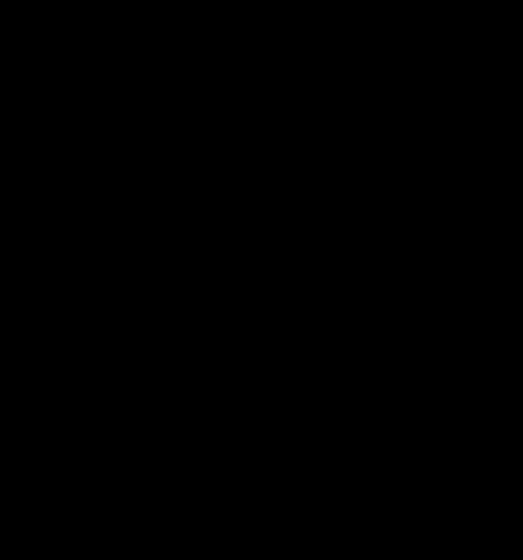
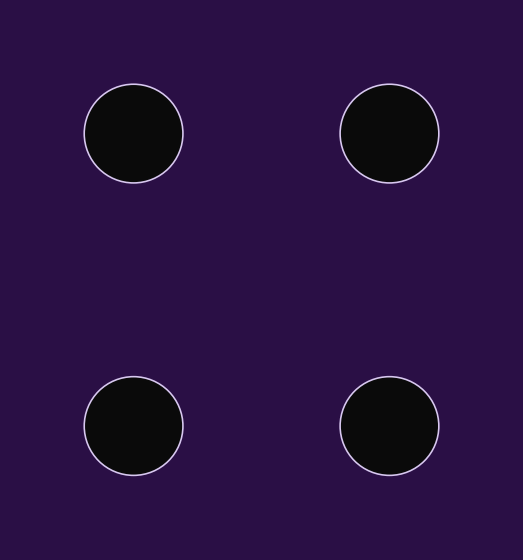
part: none -> (133, 133)
part: none -> (389, 133)
part: none -> (133, 426)
part: none -> (389, 426)

